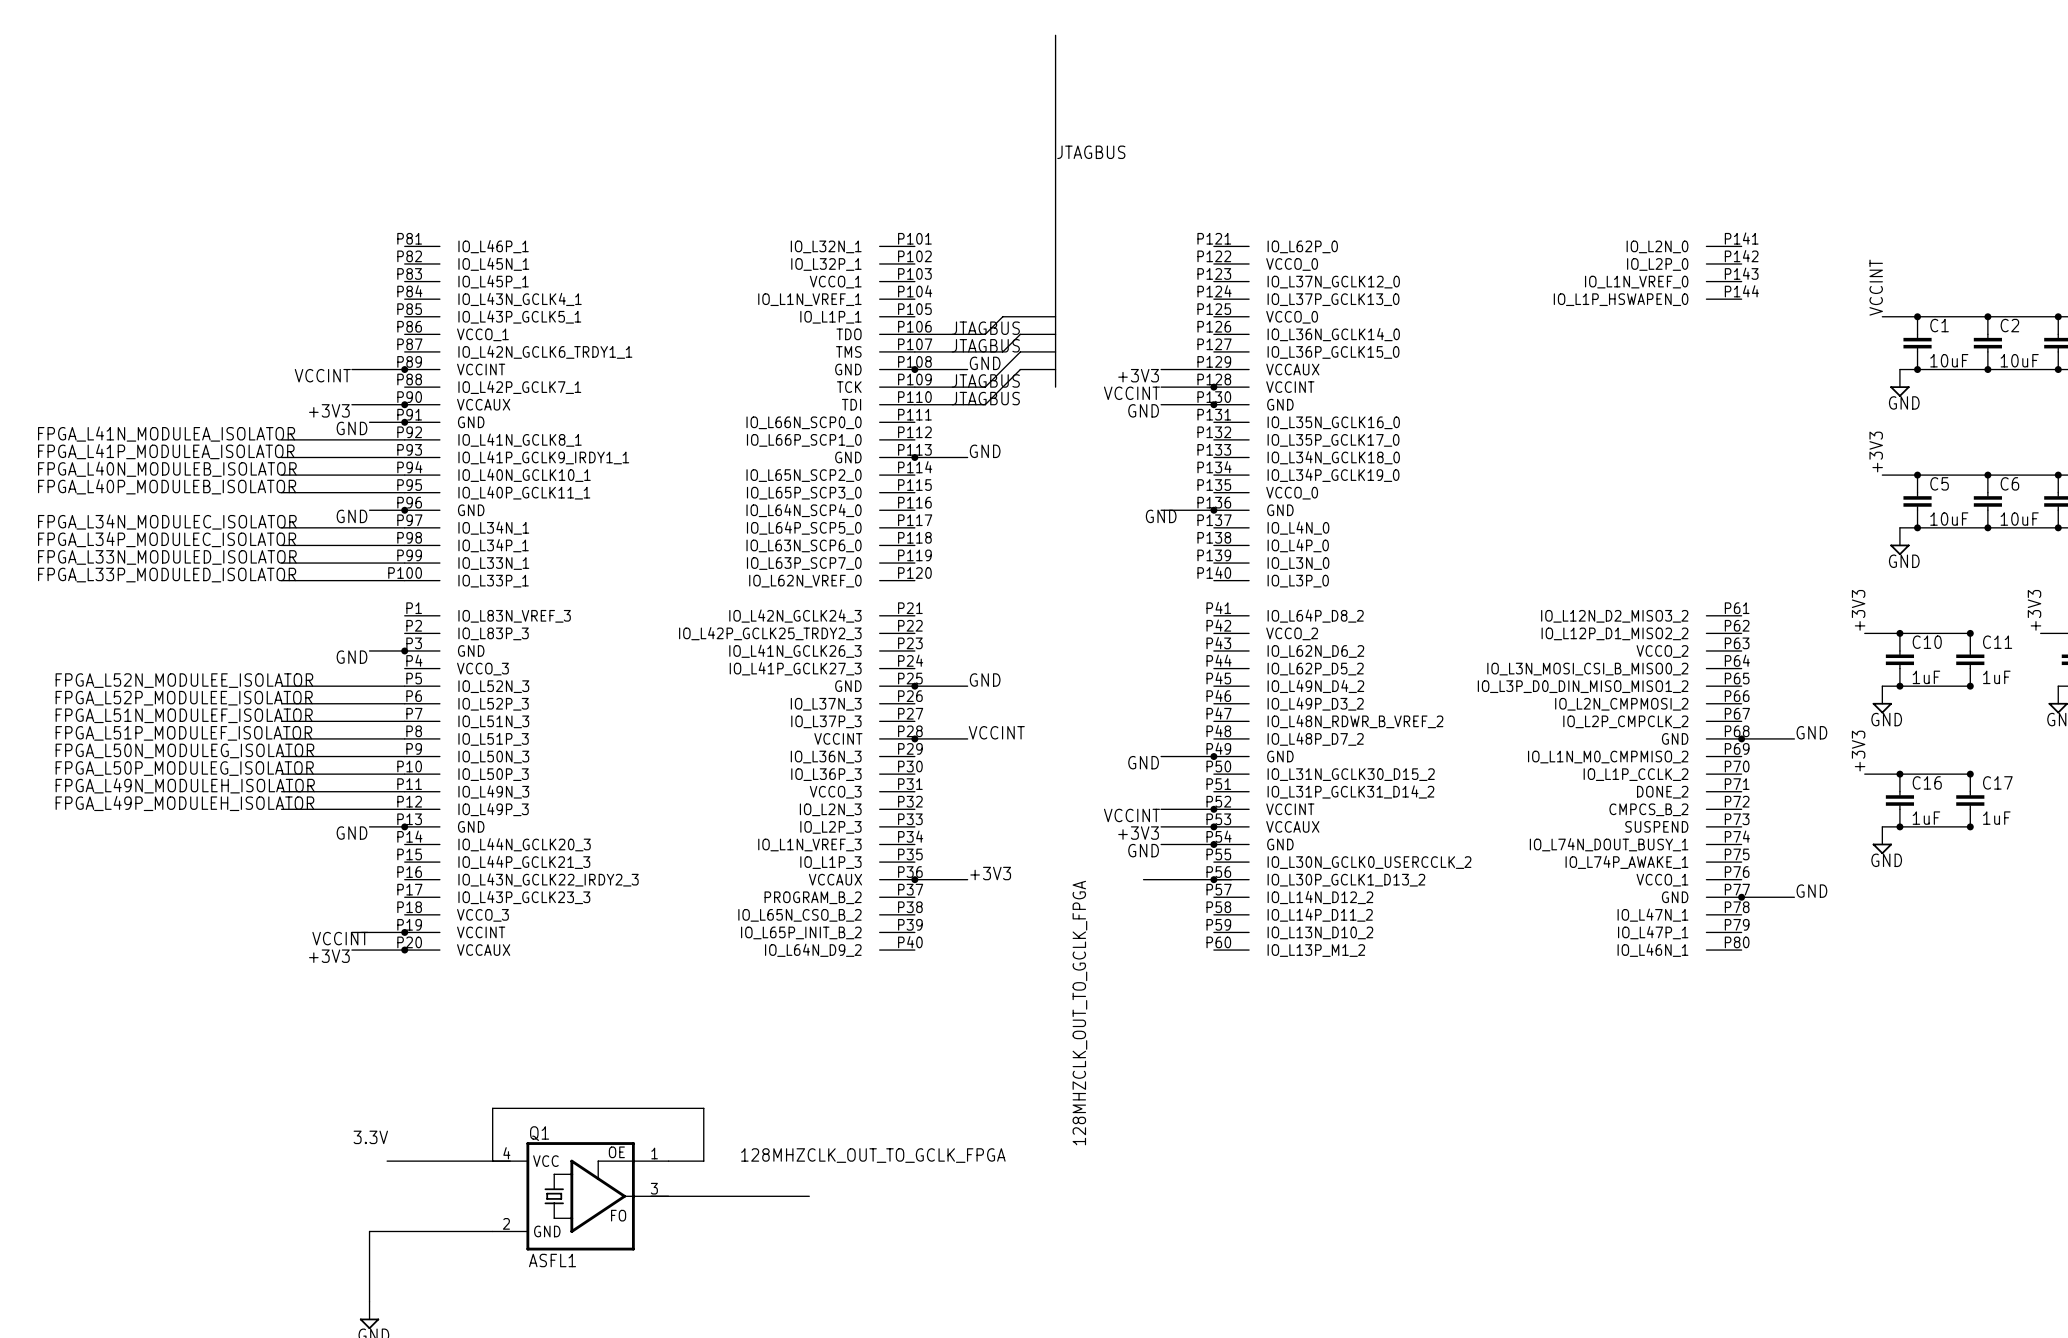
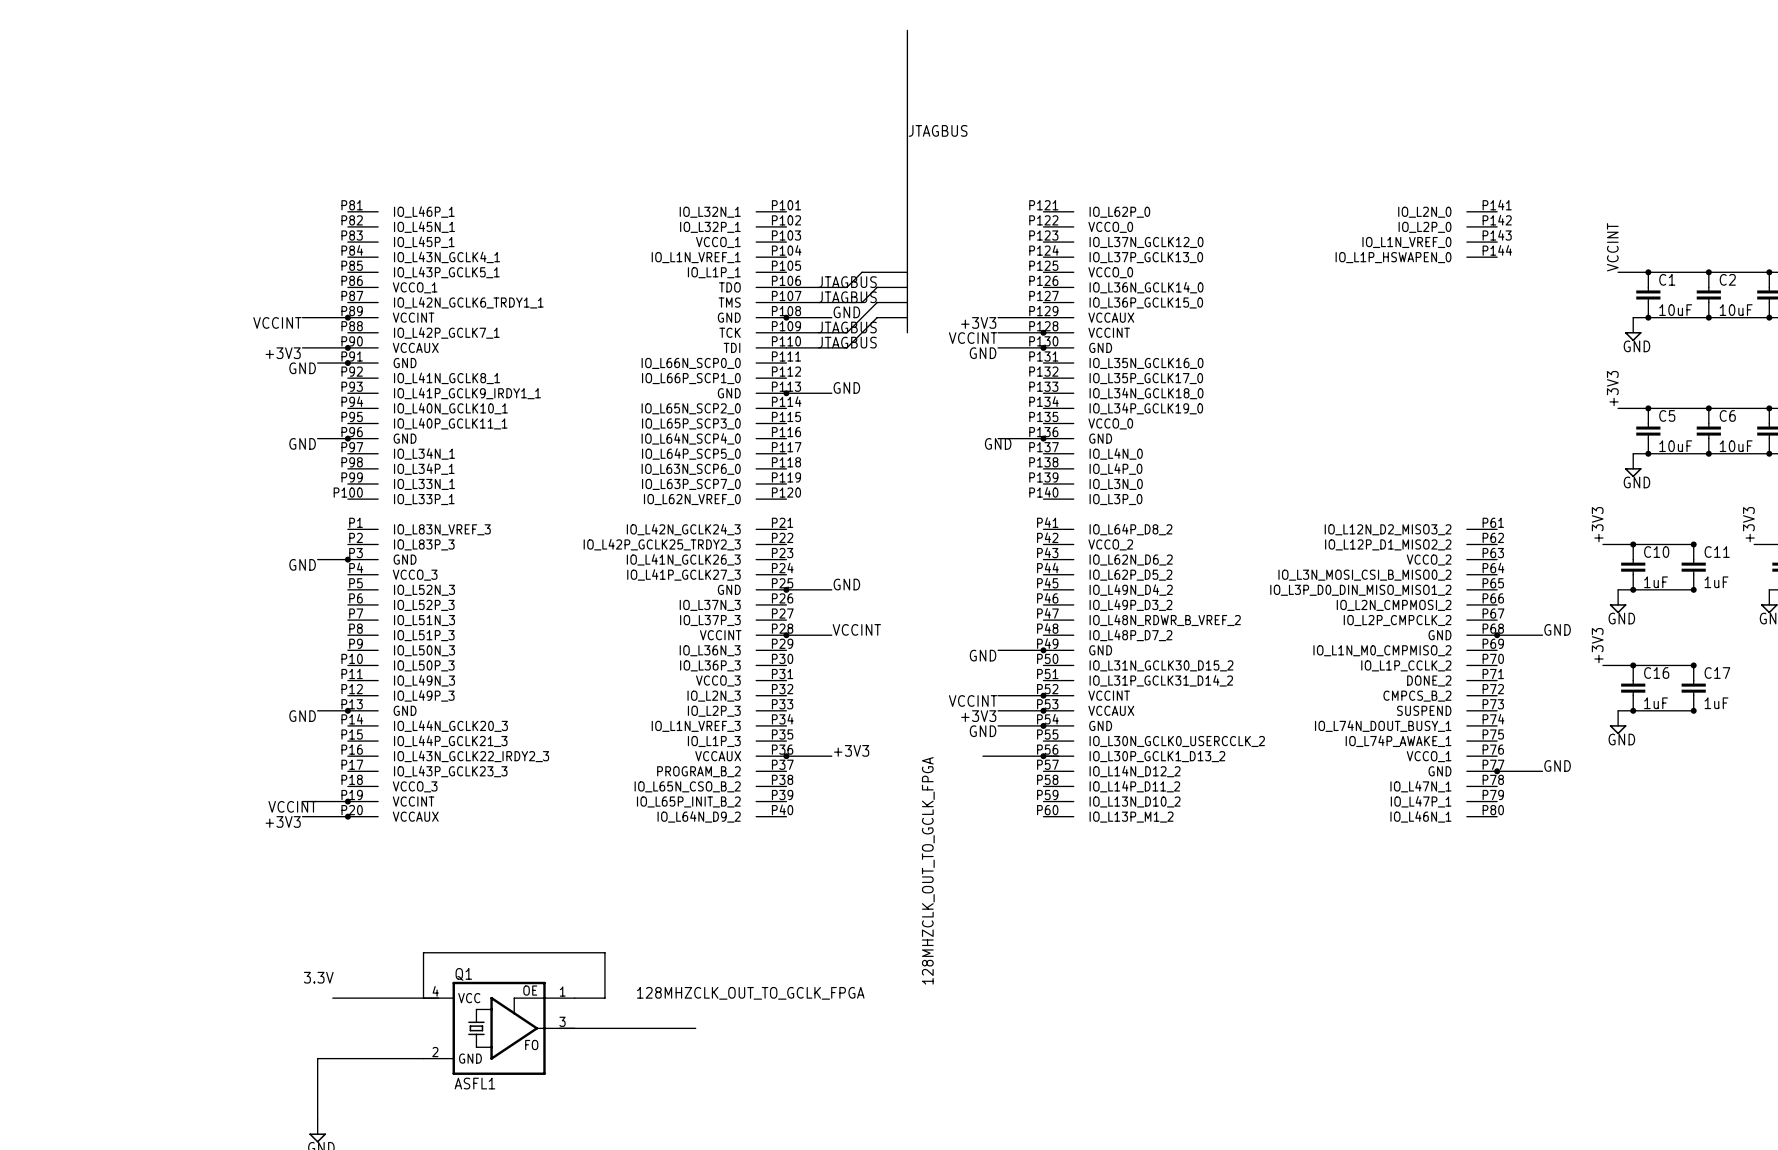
label: FPGA_L41N_MODULEA_ISOLATOR (166, 434) -> none
wire: (281, 439) (404, 439) -> none
label: FPGA_L41P_MODULEA_ISOLATOR (166, 451) -> none
wire: (281, 457) (404, 457) -> none
label: FPGA_L40N_MODULEB_ISOLATOR (167, 469) -> none
wire: (281, 475) (404, 475) -> none
label: FPGA_L40P_MODULEB_ISOLATOR (167, 486) -> none
wire: (281, 492) (404, 492) -> none
label: FPGA_L34N_MODULEC_ISOLATOR (167, 521) -> none
wire: (281, 527) (404, 527) -> none
label: FPGA_L34P_MODULEC_ISOLATOR (167, 539) -> none
wire: (281, 545) (404, 545) -> none
label: FPGA_L33N_MODULED_ISOLATOR (167, 557) -> none
wire: (281, 563) (404, 563) -> none
label: FPGA_L33P_MODULED_ISOLATOR (167, 575) -> none
wire: (281, 580) (404, 580) -> none
label: FPGA_L52N_MODULEE_ISOLATOR (184, 680) -> none
wire: (281, 686) (404, 686) -> none
label: FPGA_L52P_MODULEE_ISOLATOR (184, 698) -> none
wire: (281, 703) (404, 703) -> none
label: FPGA_L51N_MODULEF_ISOLATOR (184, 715) -> none
wire: (281, 721) (404, 721) -> none
label: FPGA_L51P_MODULEF_ISOLATOR (183, 733) -> none
wire: (281, 738) (404, 738) -> none
label: FPGA_L50N_MODULEG_ISOLATOR (184, 750) -> none
wire: (281, 756) (404, 756) -> none
label: FPGA_L50P_MODULEG_ISOLATOR (184, 768) -> none
wire: (281, 774) (404, 774) -> none
label: FPGA_L49N_MODULEH_ISOLATOR (185, 785) -> none
wire: (281, 791) (404, 791) -> none
label: FPGA_L49P_MODULEH_ISOLATOR (184, 803) -> none
wire: (281, 809) (404, 809) -> none

